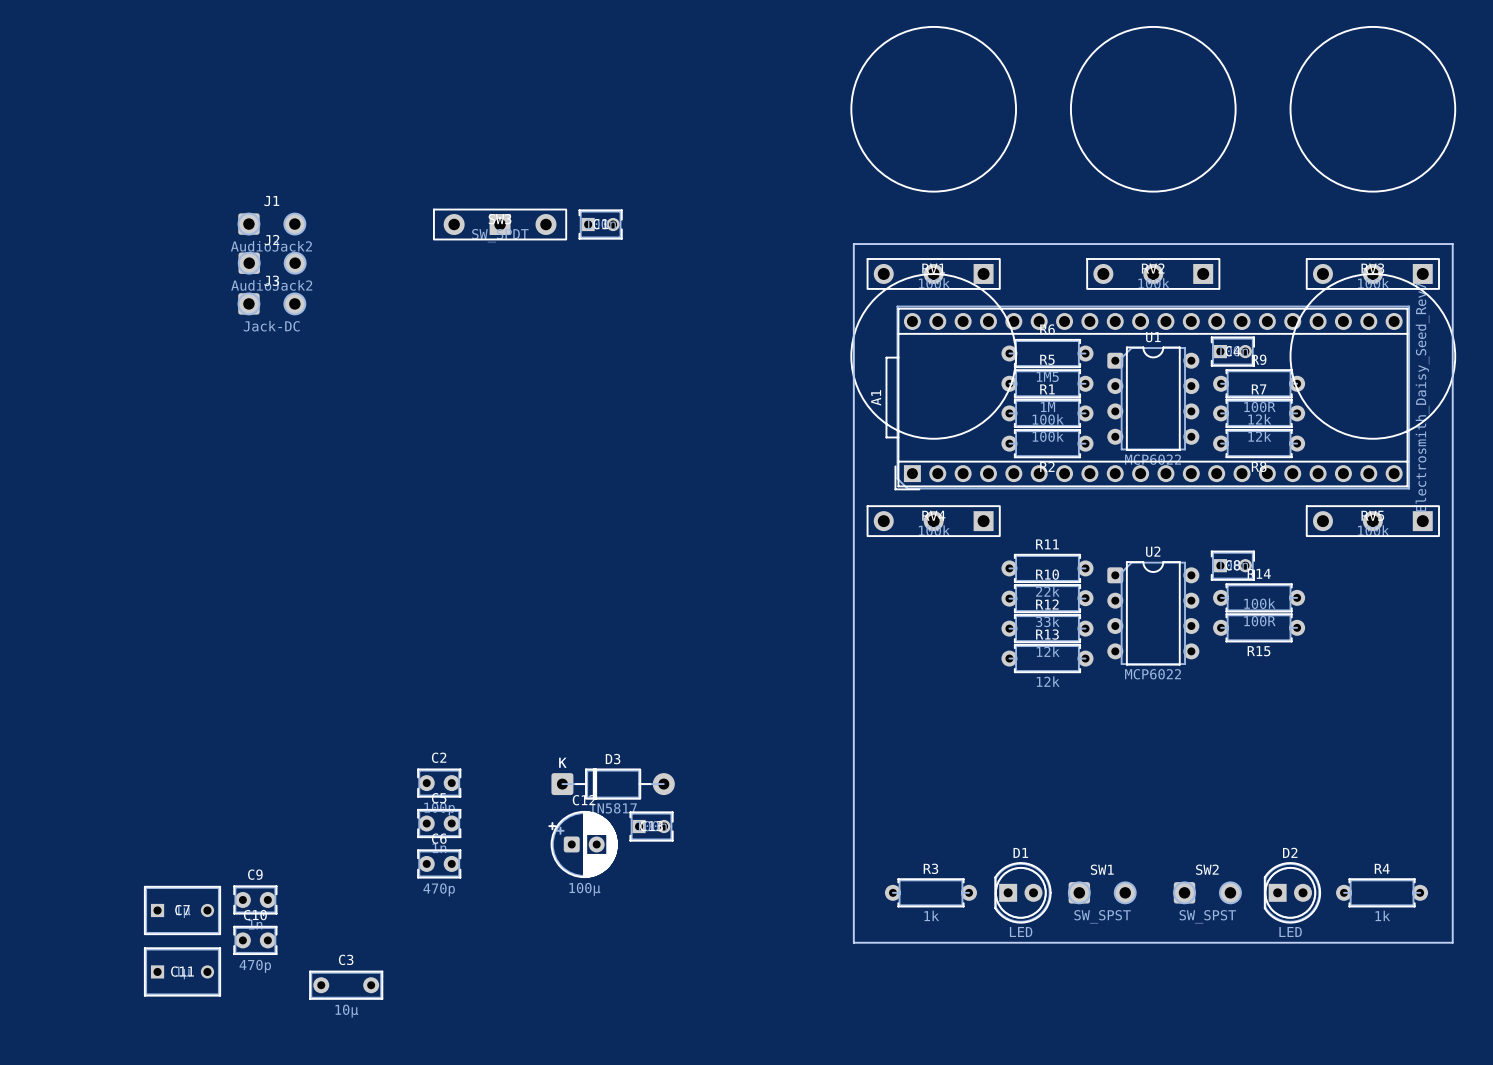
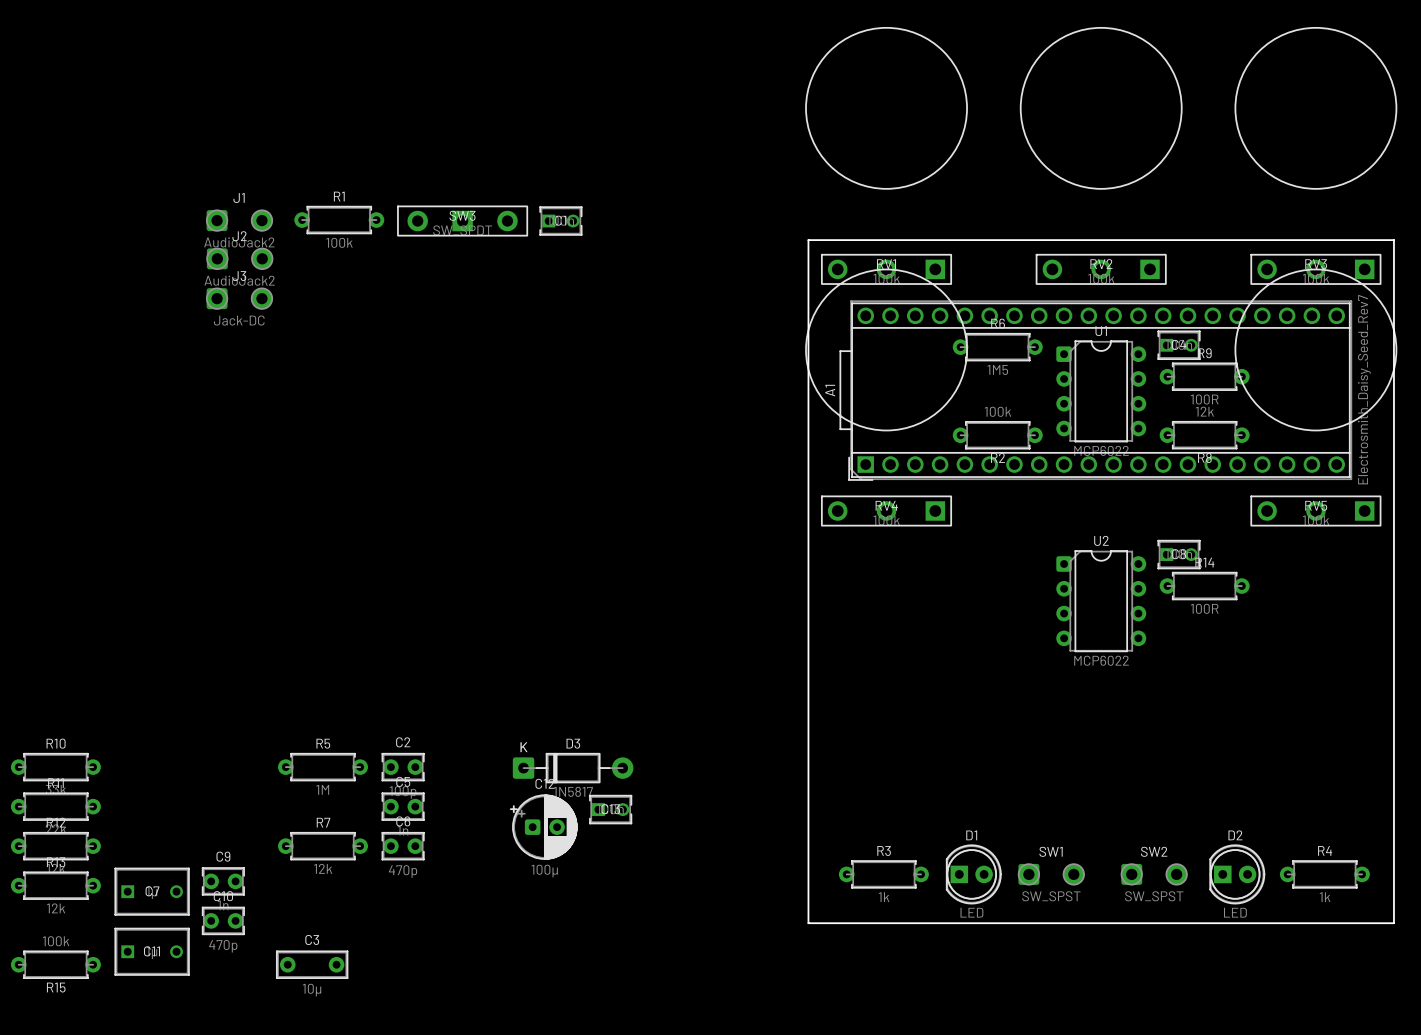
R5 position: (1047, 383) -> (323, 767)
R1 position: (1047, 413) -> (339, 220)
R7 position: (1259, 413) -> (323, 846)
R11 position: (1047, 568) -> (55, 806)
R10 footprint: [1001, 584, 1094, 613] -> [10, 753, 101, 782]
R15 position: (1259, 627) -> (55, 964)
R12 position: (1047, 628) -> (55, 846)
R13 position: (1047, 658) -> (55, 885)

